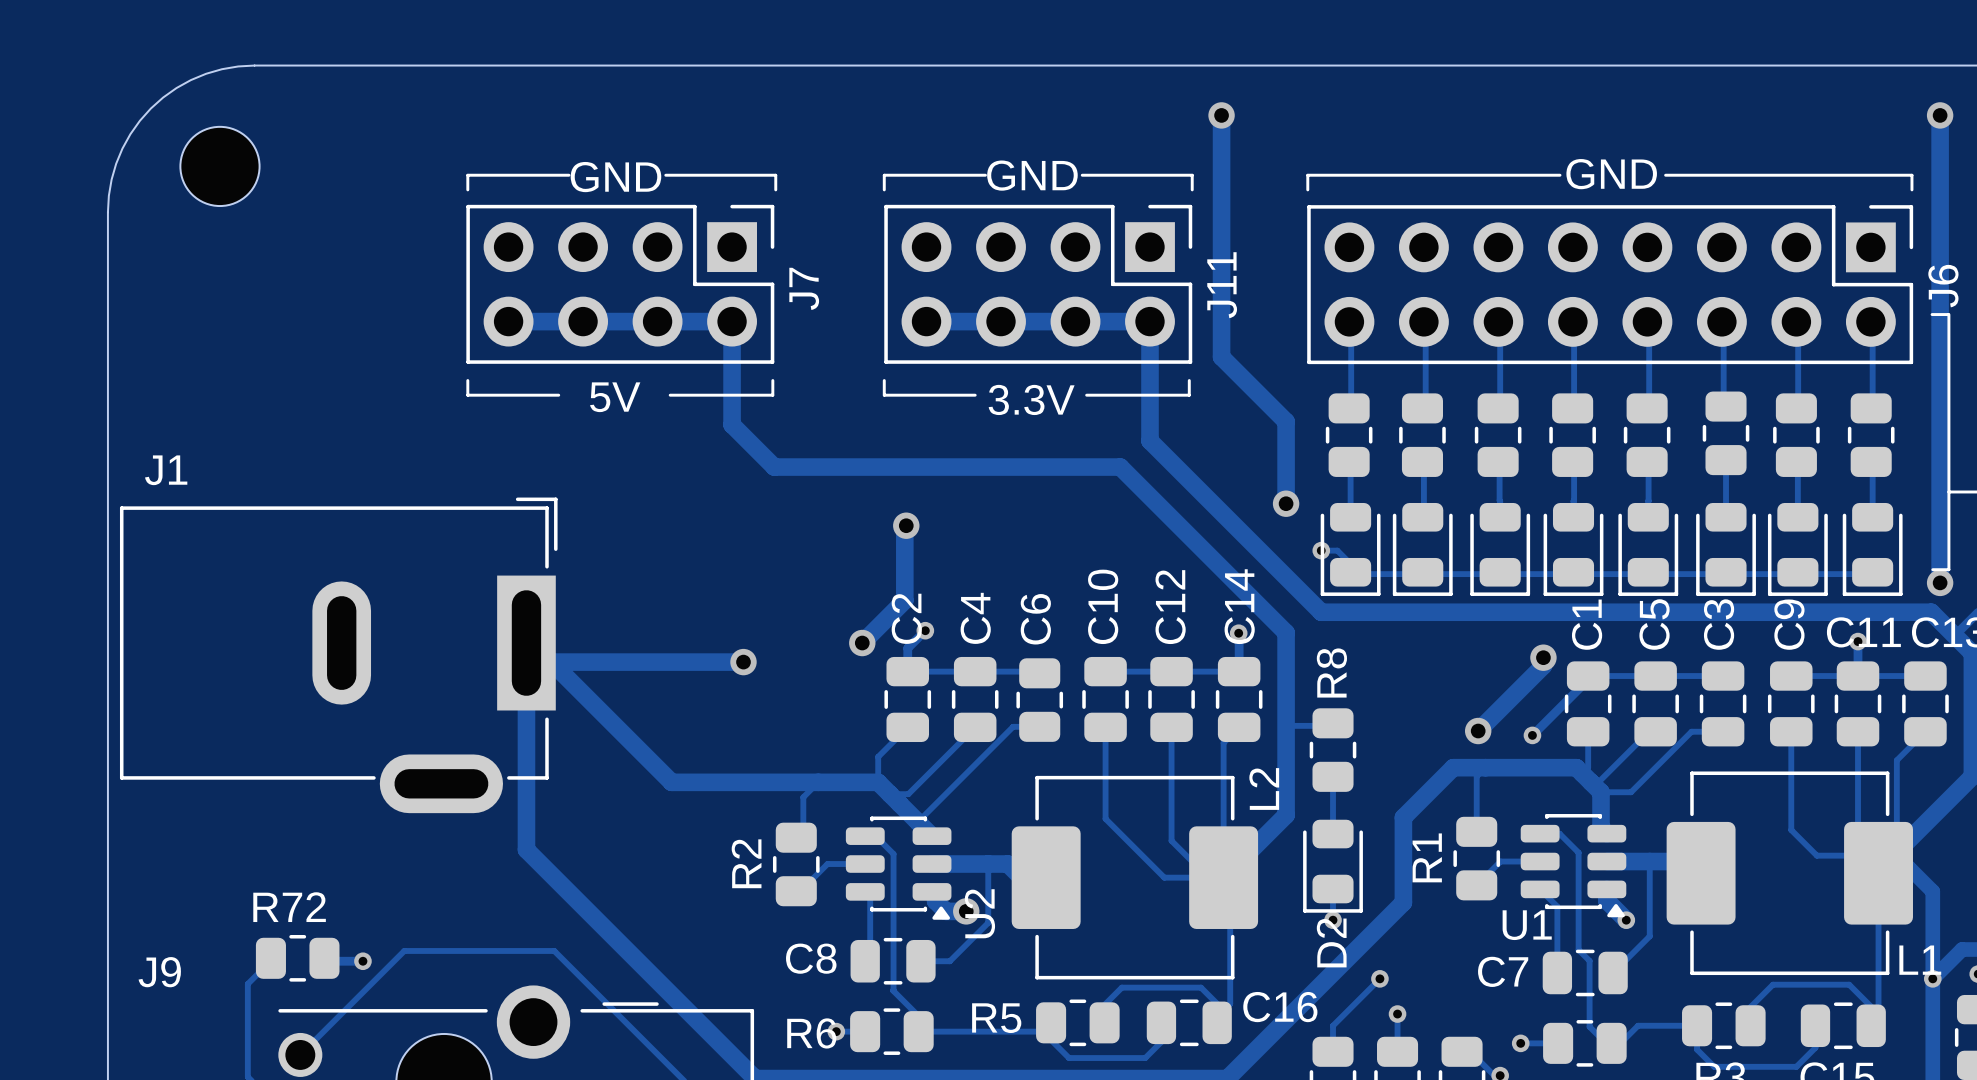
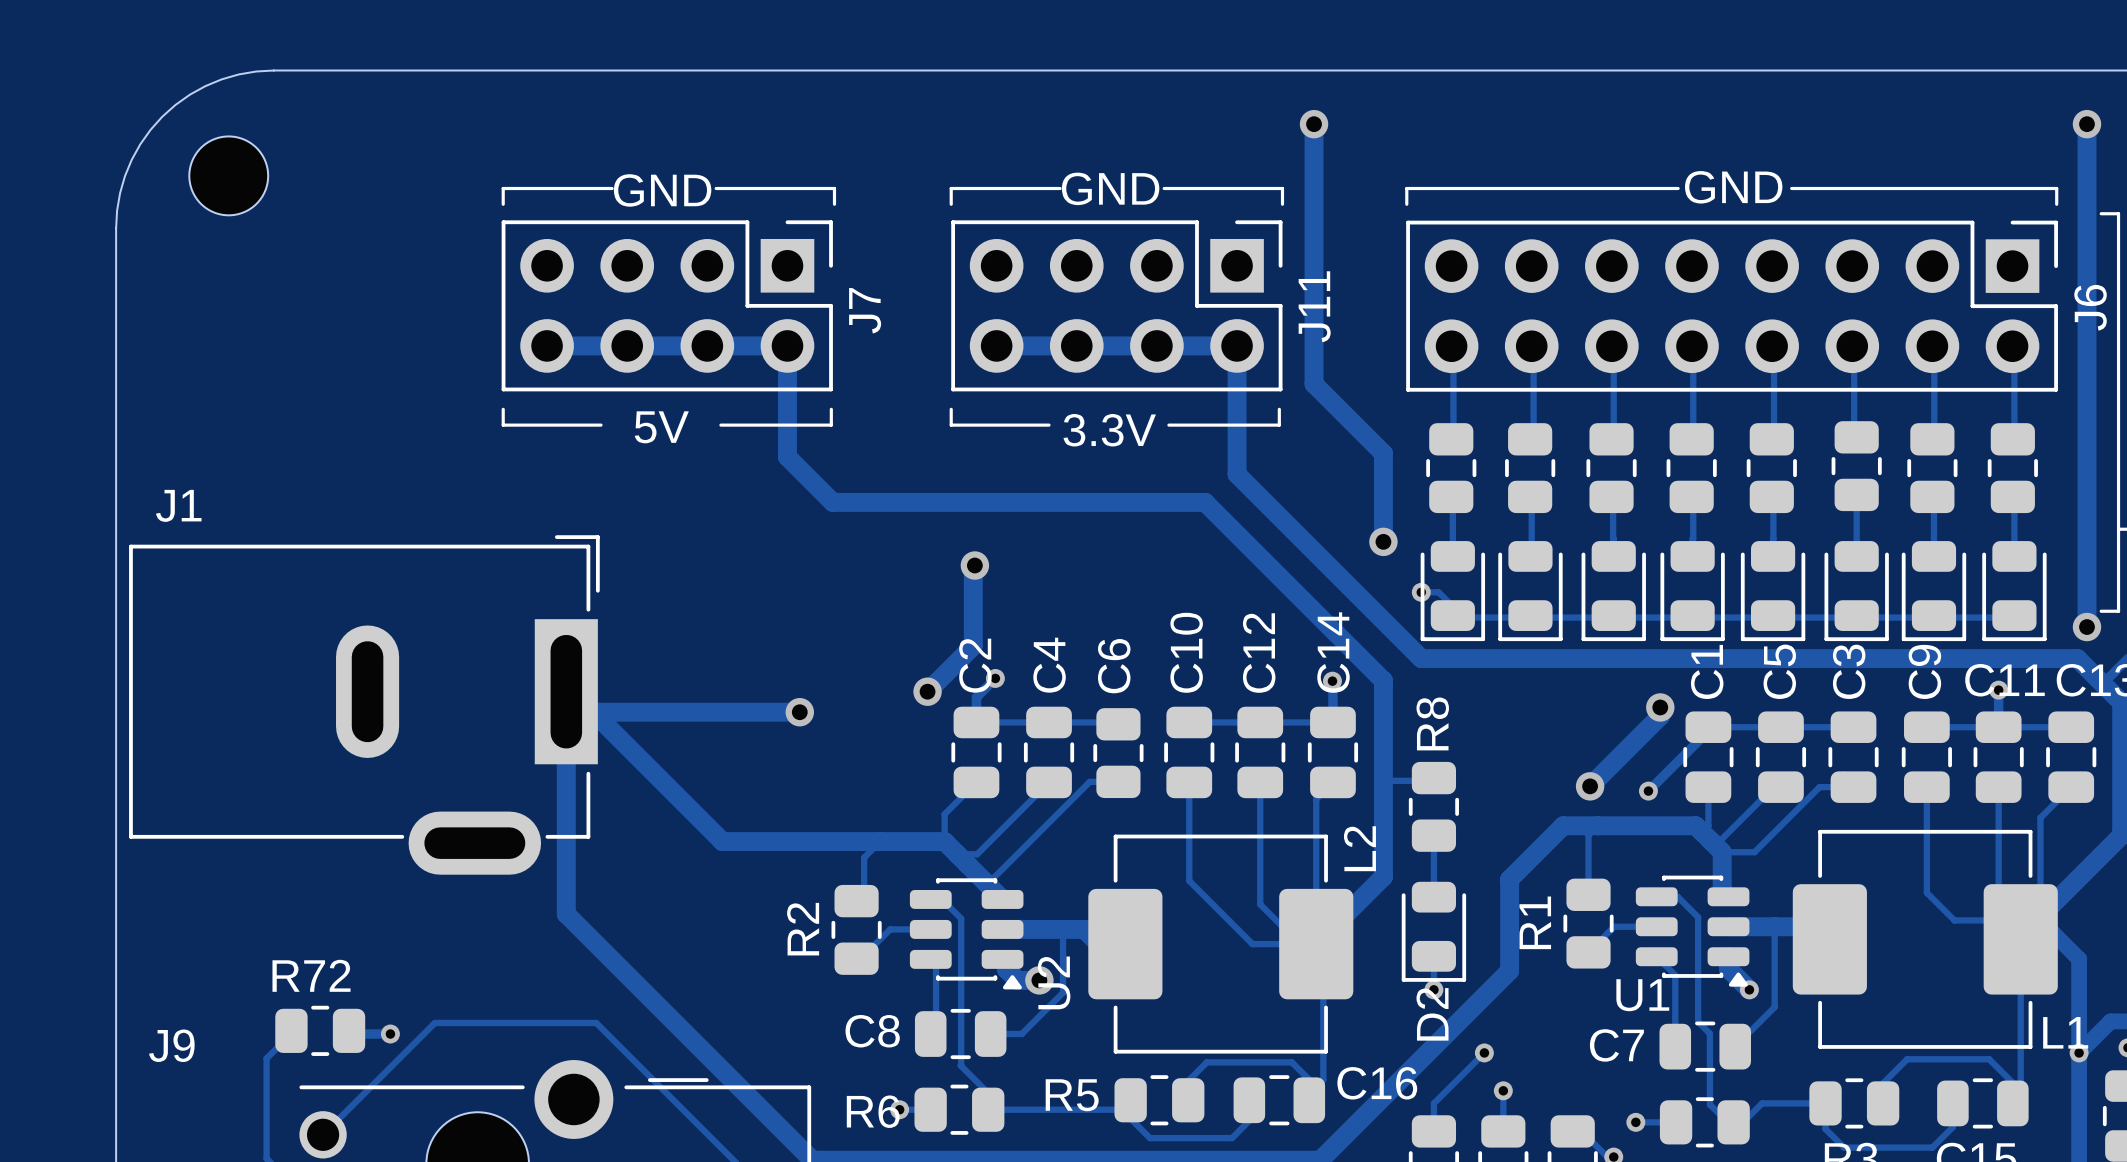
part footprint: [180, 126, 260, 207] -> [189, 136, 269, 216]
line: none -> (2101, 213) (2118, 213) (2118, 611) (2101, 611)
line: (1932, 314) (1948, 314) -> none
line: (1948, 314) (1948, 569) (1932, 569) -> none
line: (1948, 491) (1969, 491) -> none

